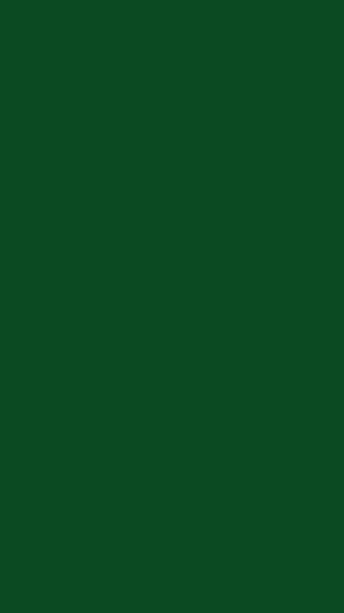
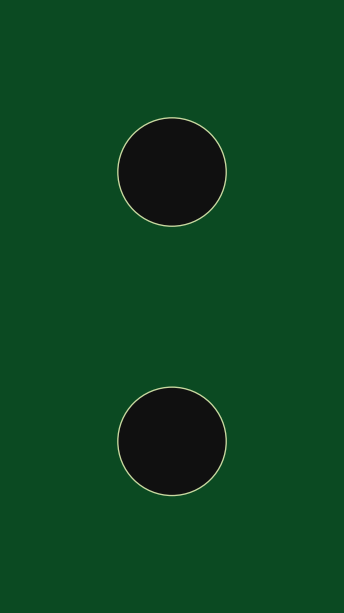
part: none -> (172, 172)
part: none -> (172, 441)

